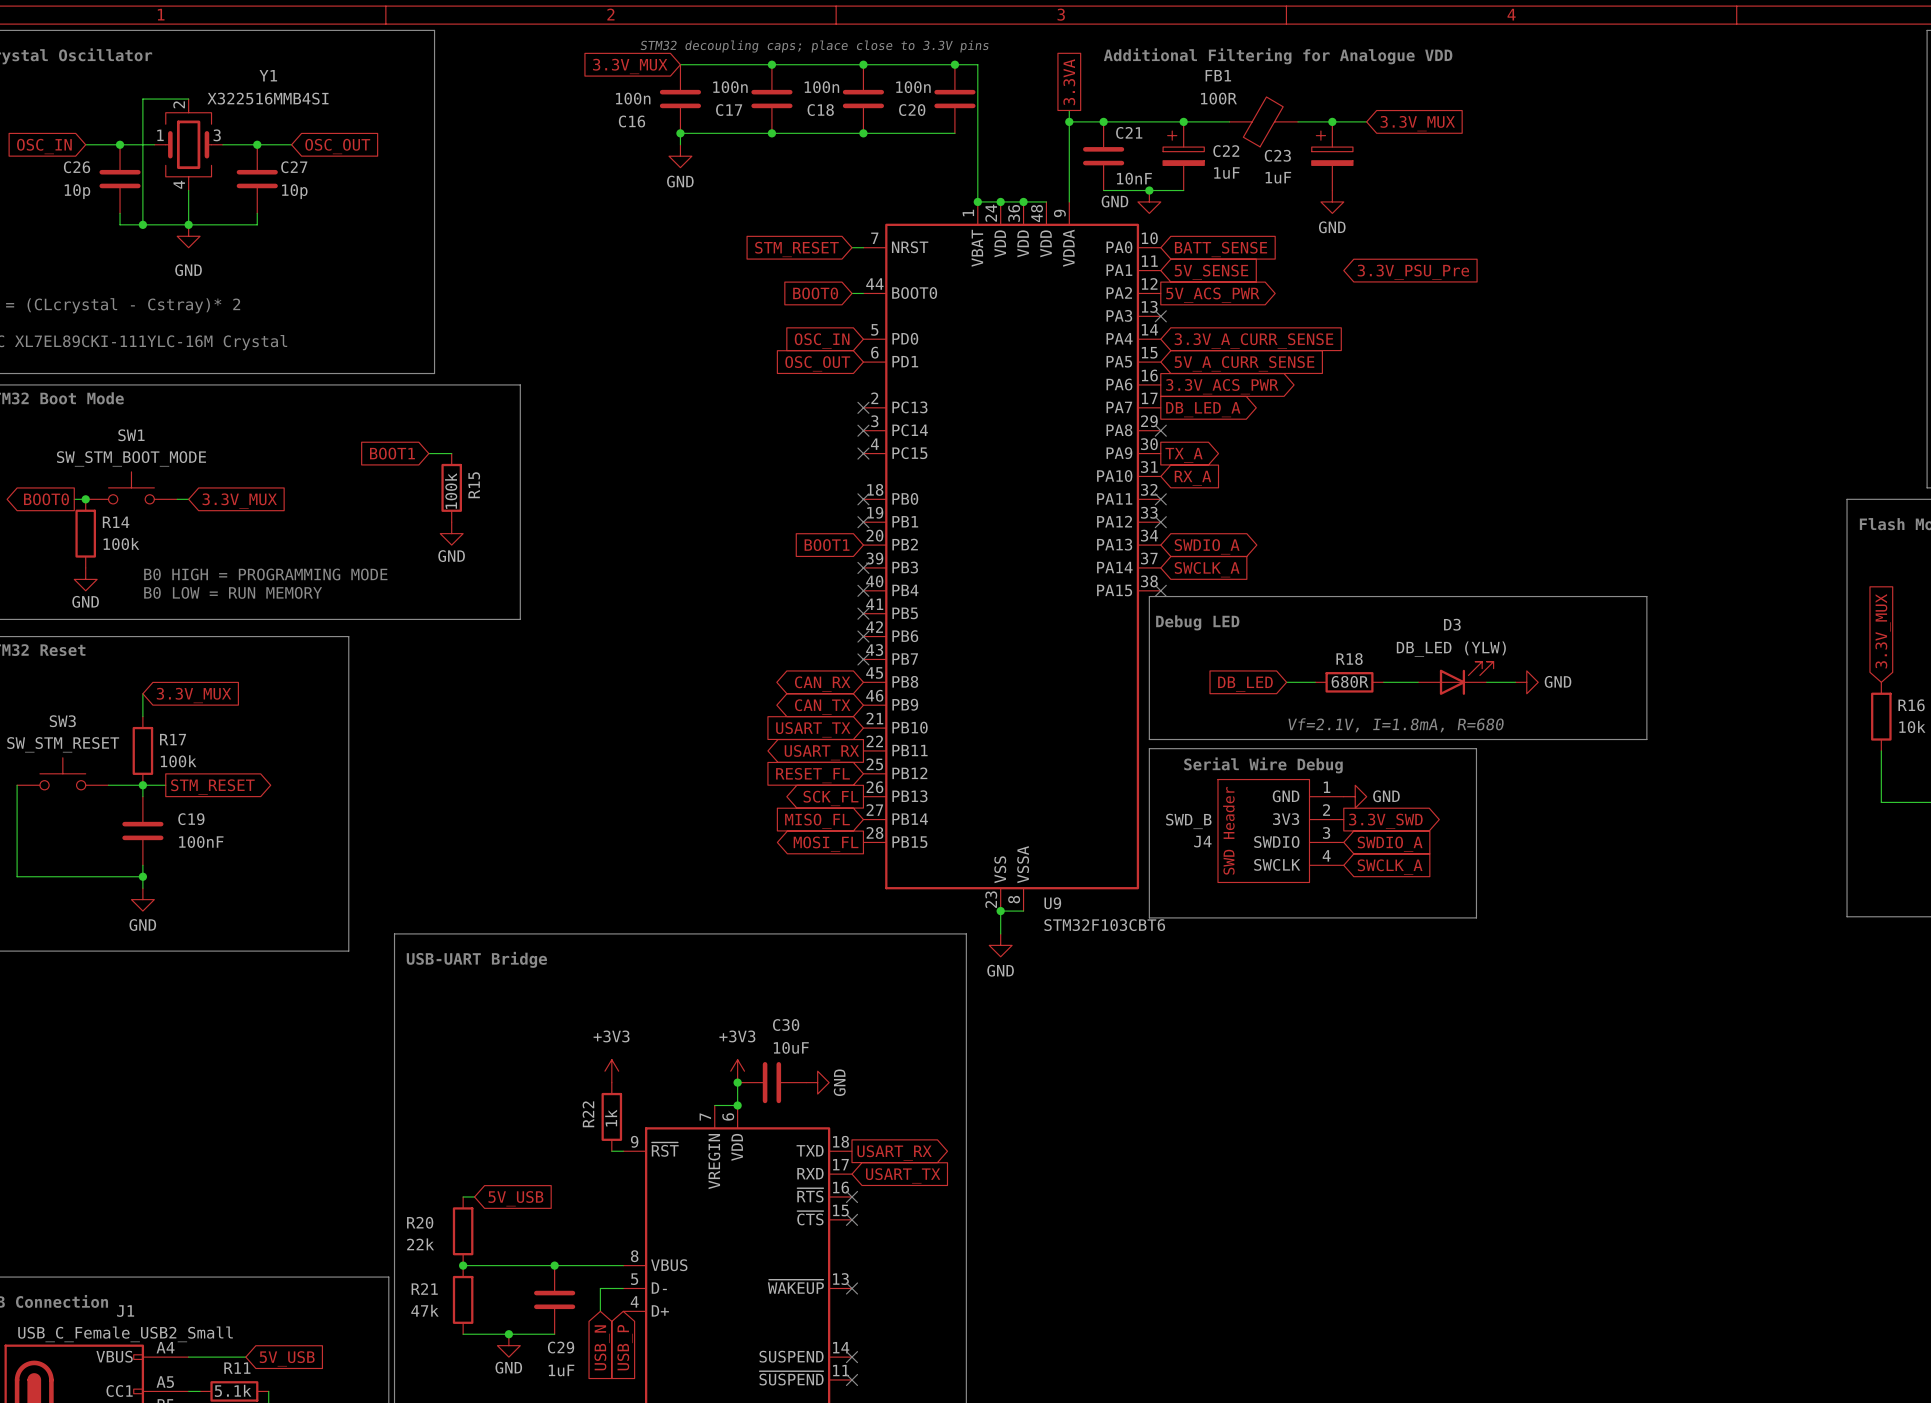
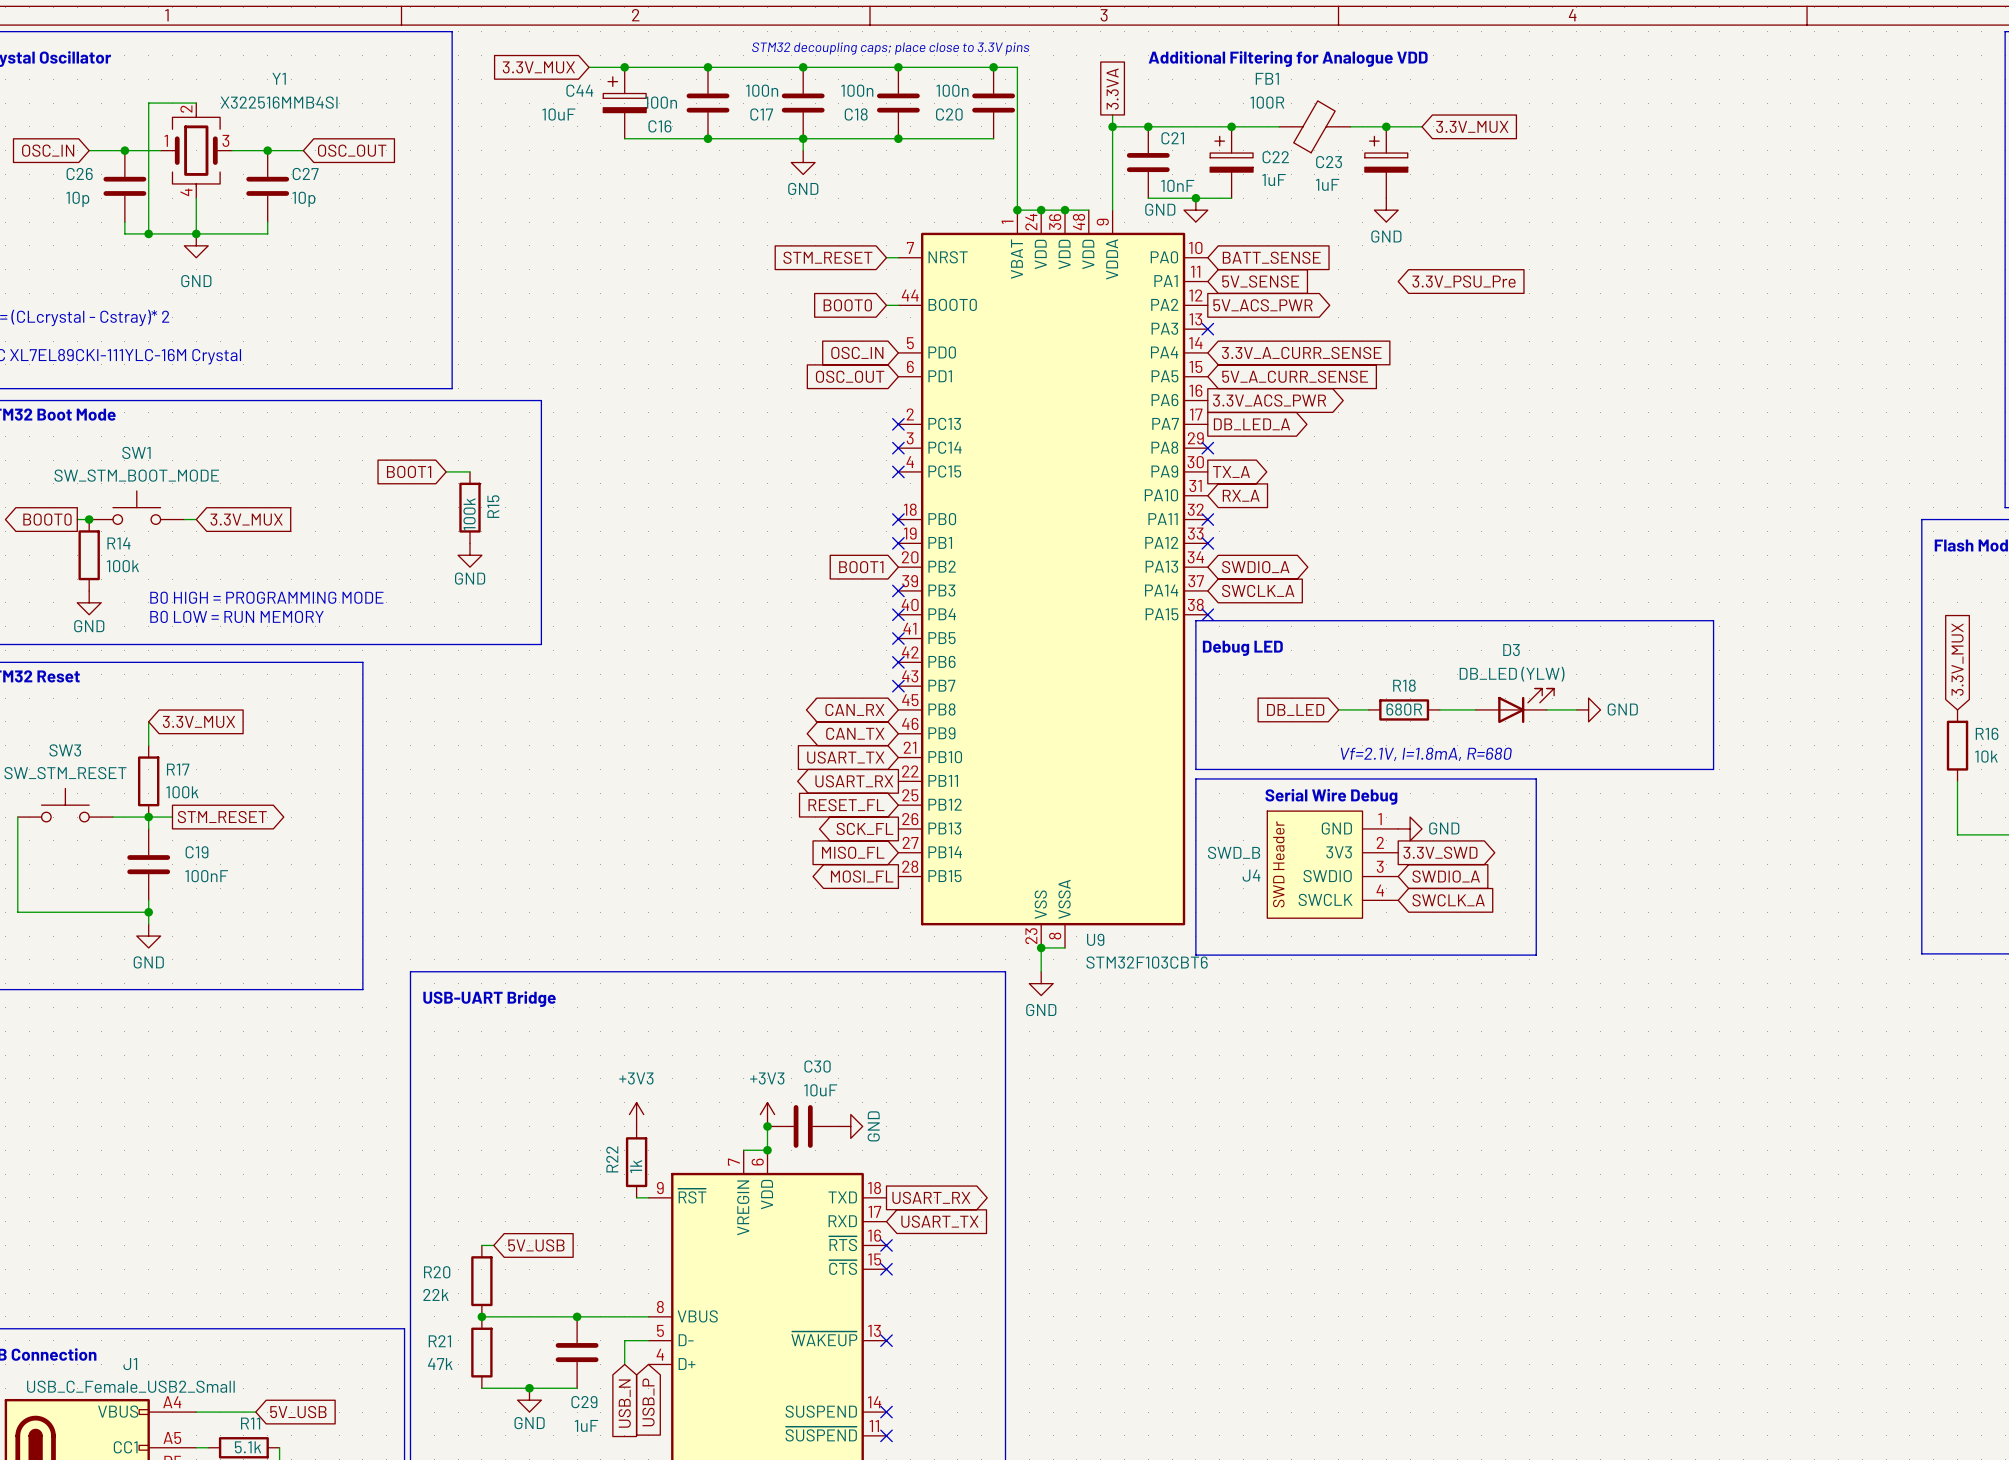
wire: none -> (588, 67) (707, 67)
junction: none -> (624, 67)
junction: none -> (707, 67)
global label position: 3.3V_MUX (630, 66) -> 3.3V_MUX (538, 67)
C44: none -> 10uF (624, 103)
wire: (680, 133) (680, 144) -> (707, 138) (624, 138)
wire: none -> (803, 138) (803, 150)
power symbol position: GND (680, 156) -> GND (803, 162)

